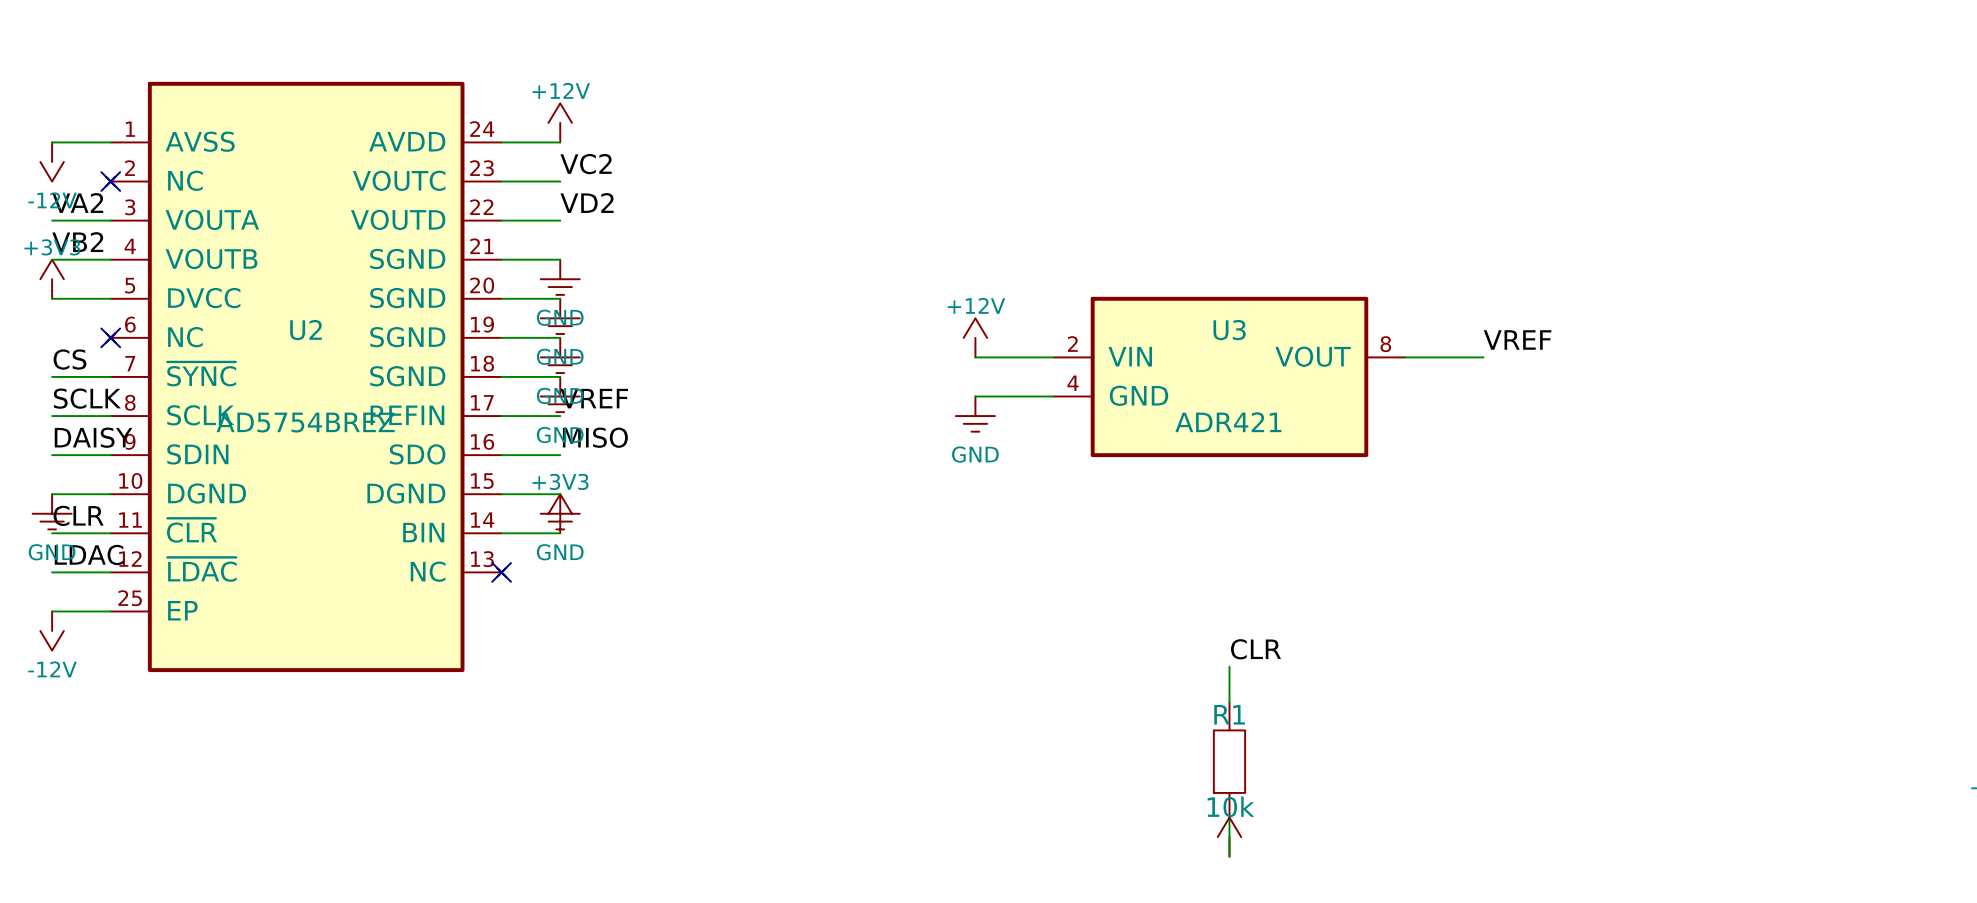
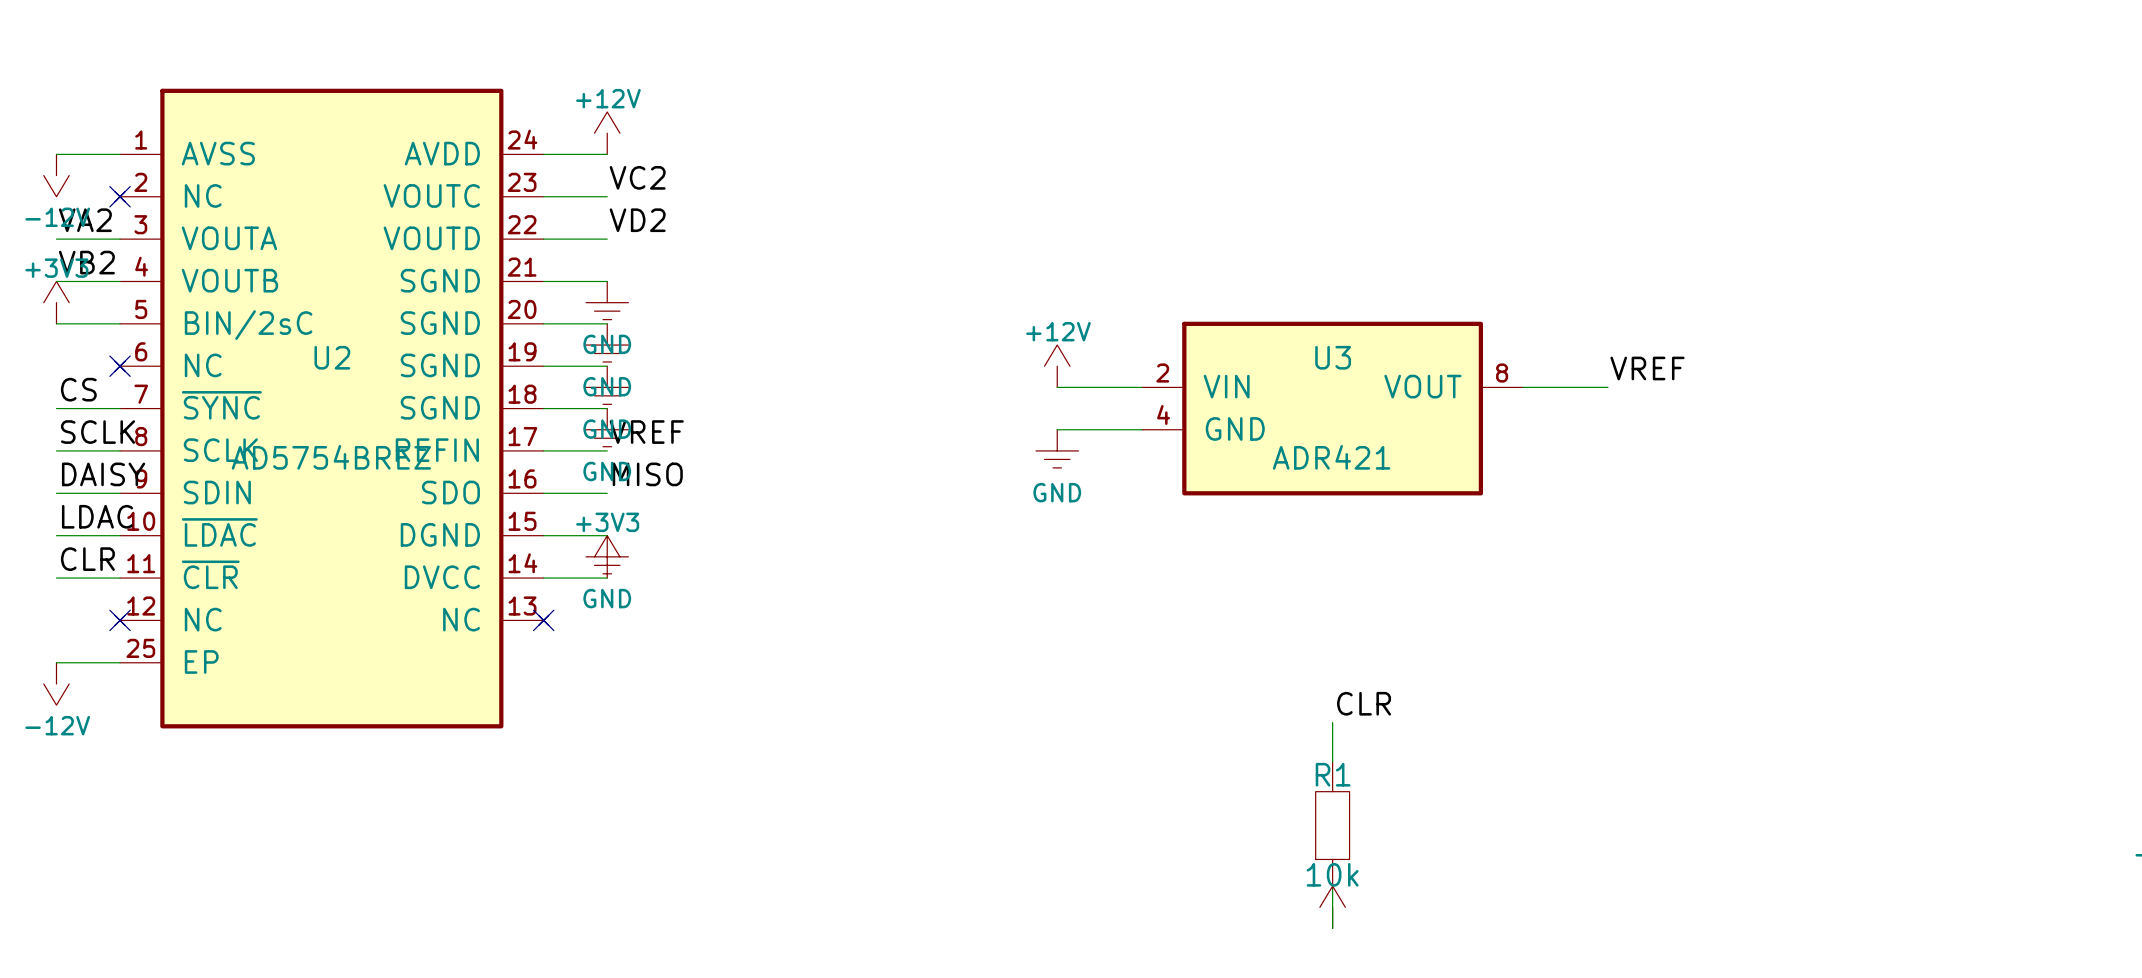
U2 symbol: [106, 81, 507, 673] -> [115, 88, 549, 729]
power symbol: GND (52, 511) -> none
label position: LDAC (89, 554) -> LDAC (97, 516)
wire: (52, 572) (110, 572) -> none
no-connect mark: none -> (120, 620)

